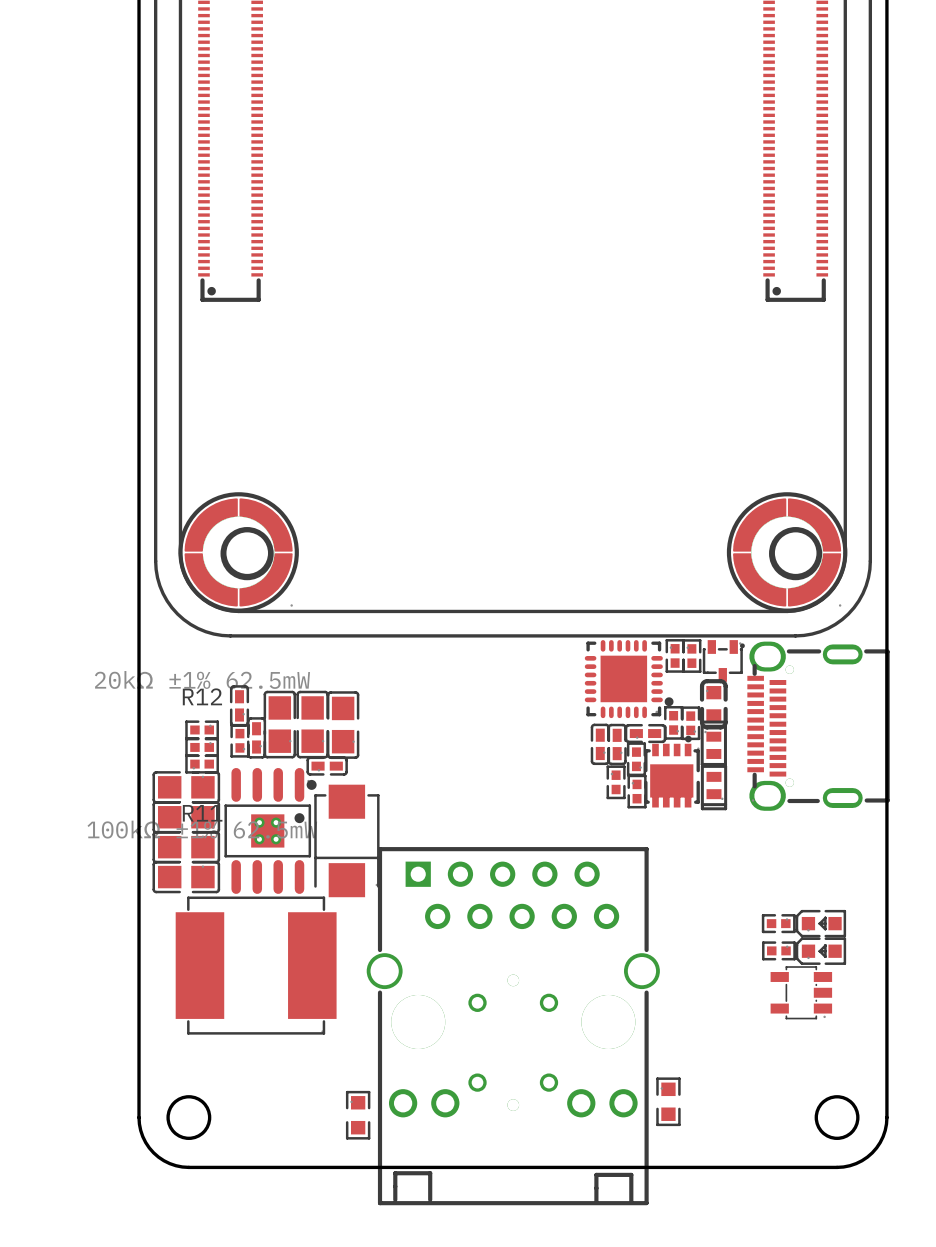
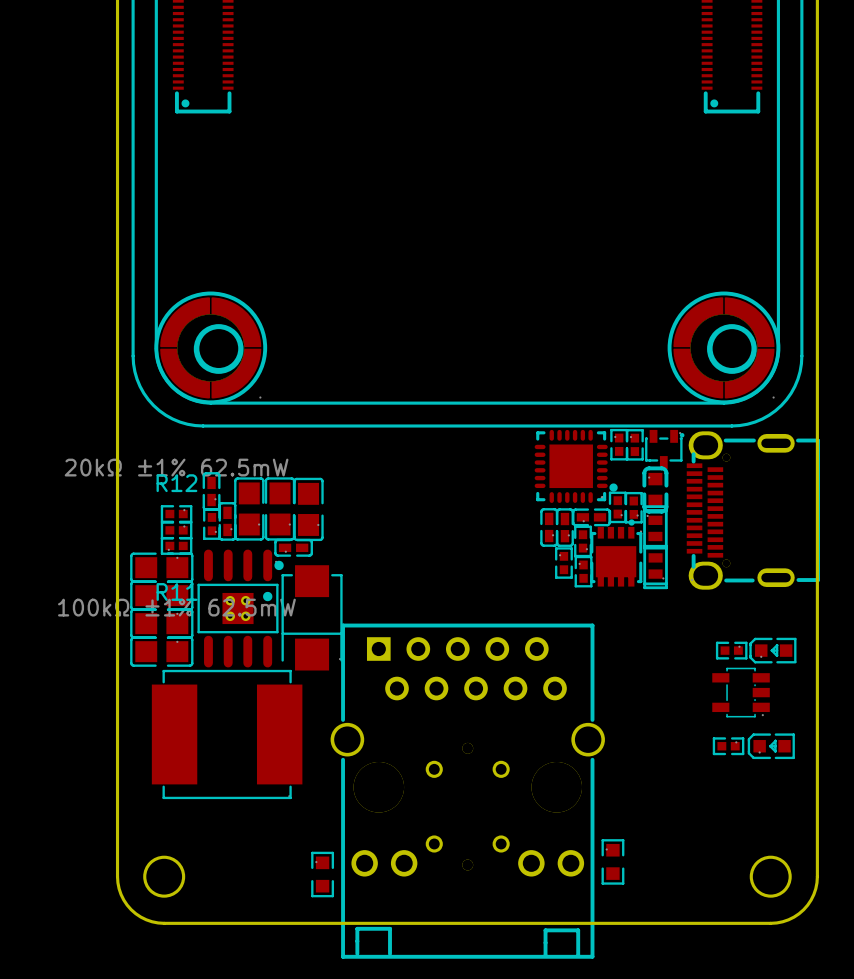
part: none -> (731, 650)
part: none -> (772, 650)
part: (778, 923) -> none
part: (820, 923) -> none
part: (778, 950) -> none
part: (820, 951) -> none
part: none -> (728, 746)
part: none -> (771, 746)
part position: (801, 992) -> (741, 692)

